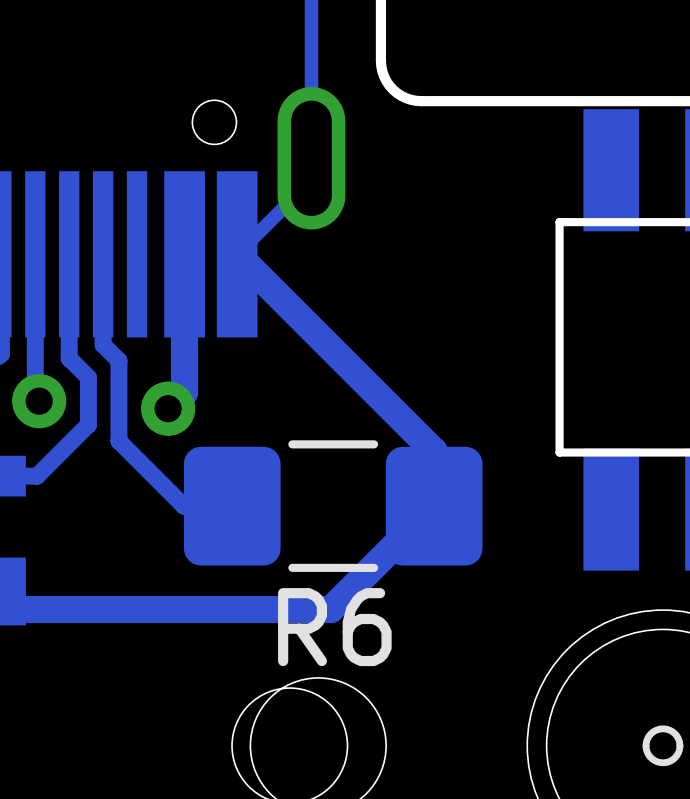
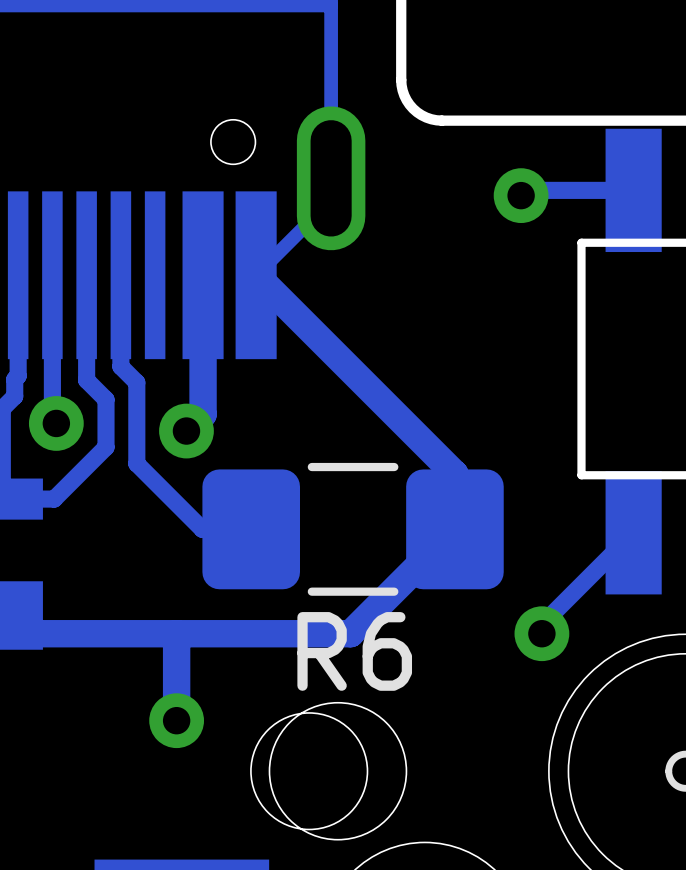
track: none -> (633, 190) (526, 190) (521, 195)
via: none -> (521, 195)
track: none -> (633, 532) (541, 624) (541, 633)
track: none -> (176, 633) (176, 720)
via: none -> (541, 633)
via: none -> (176, 720)

